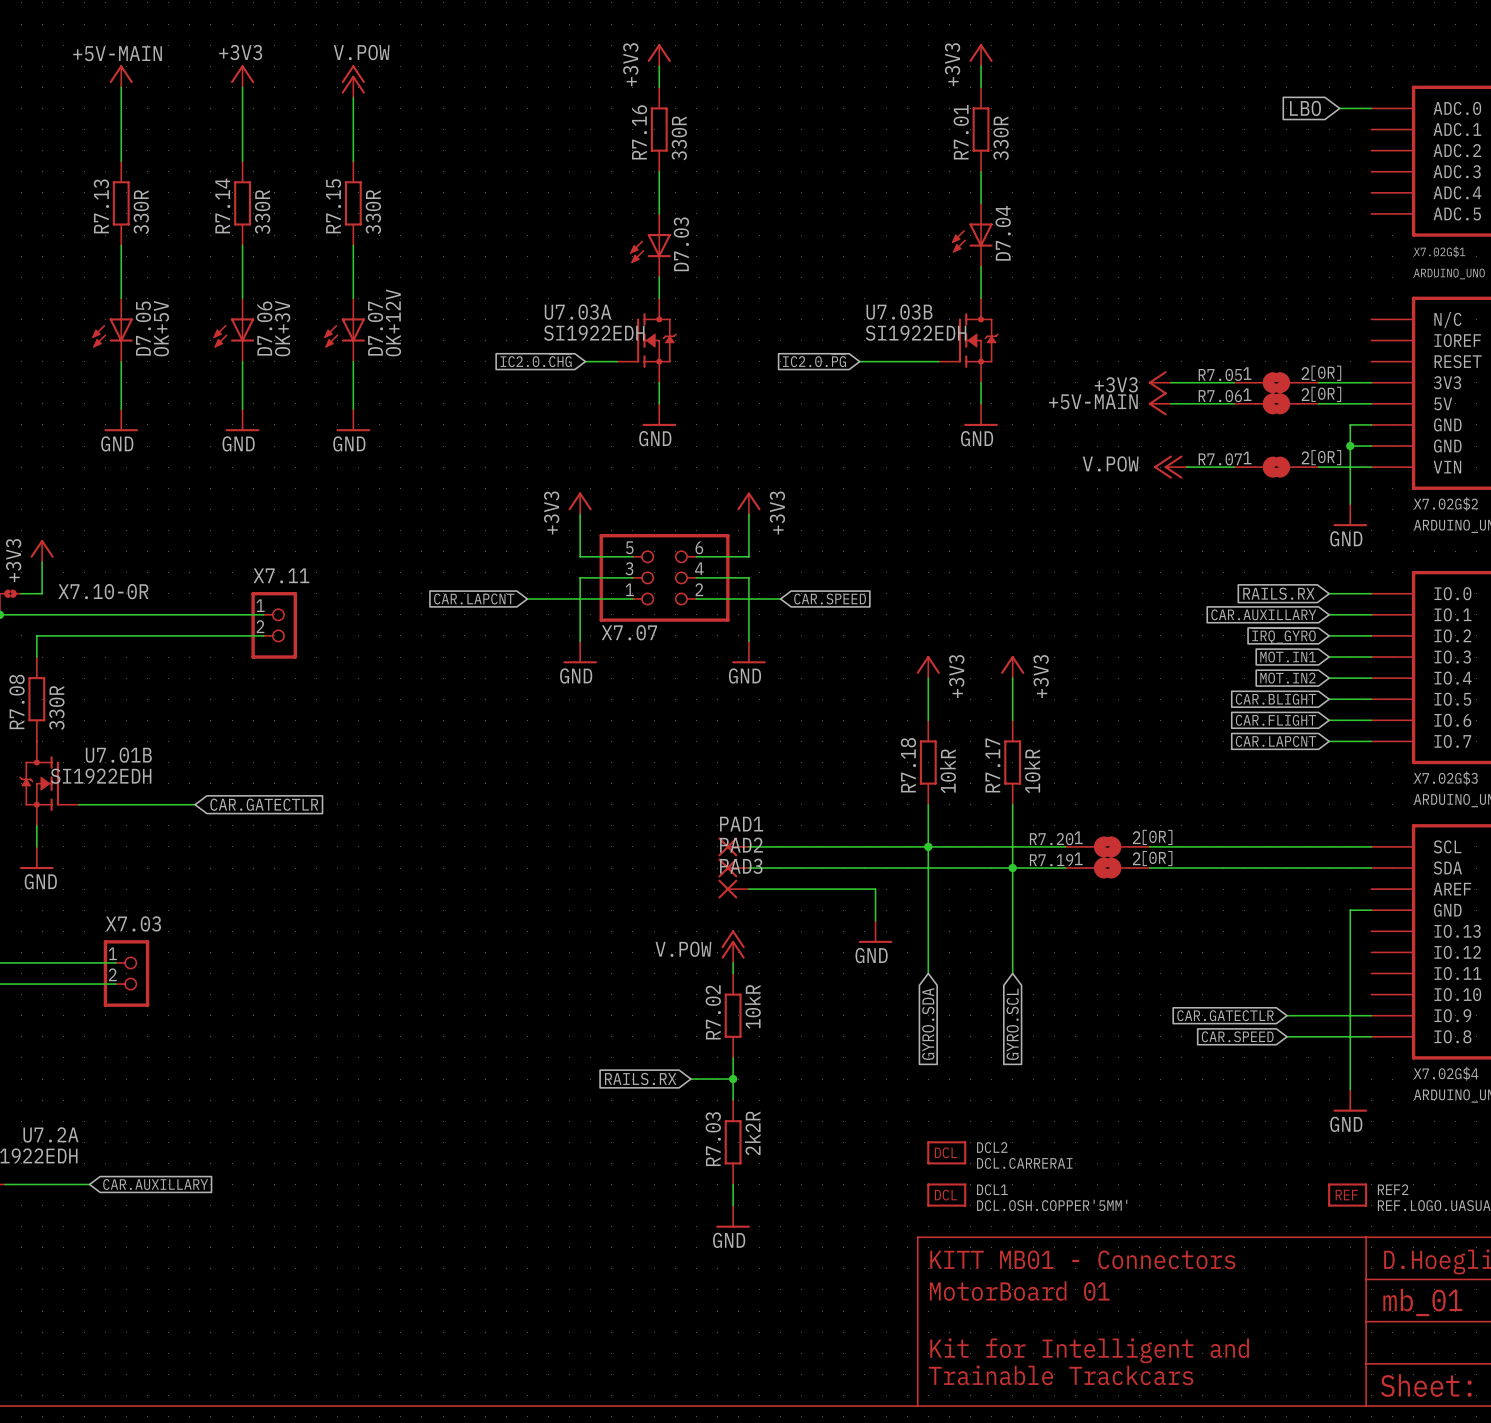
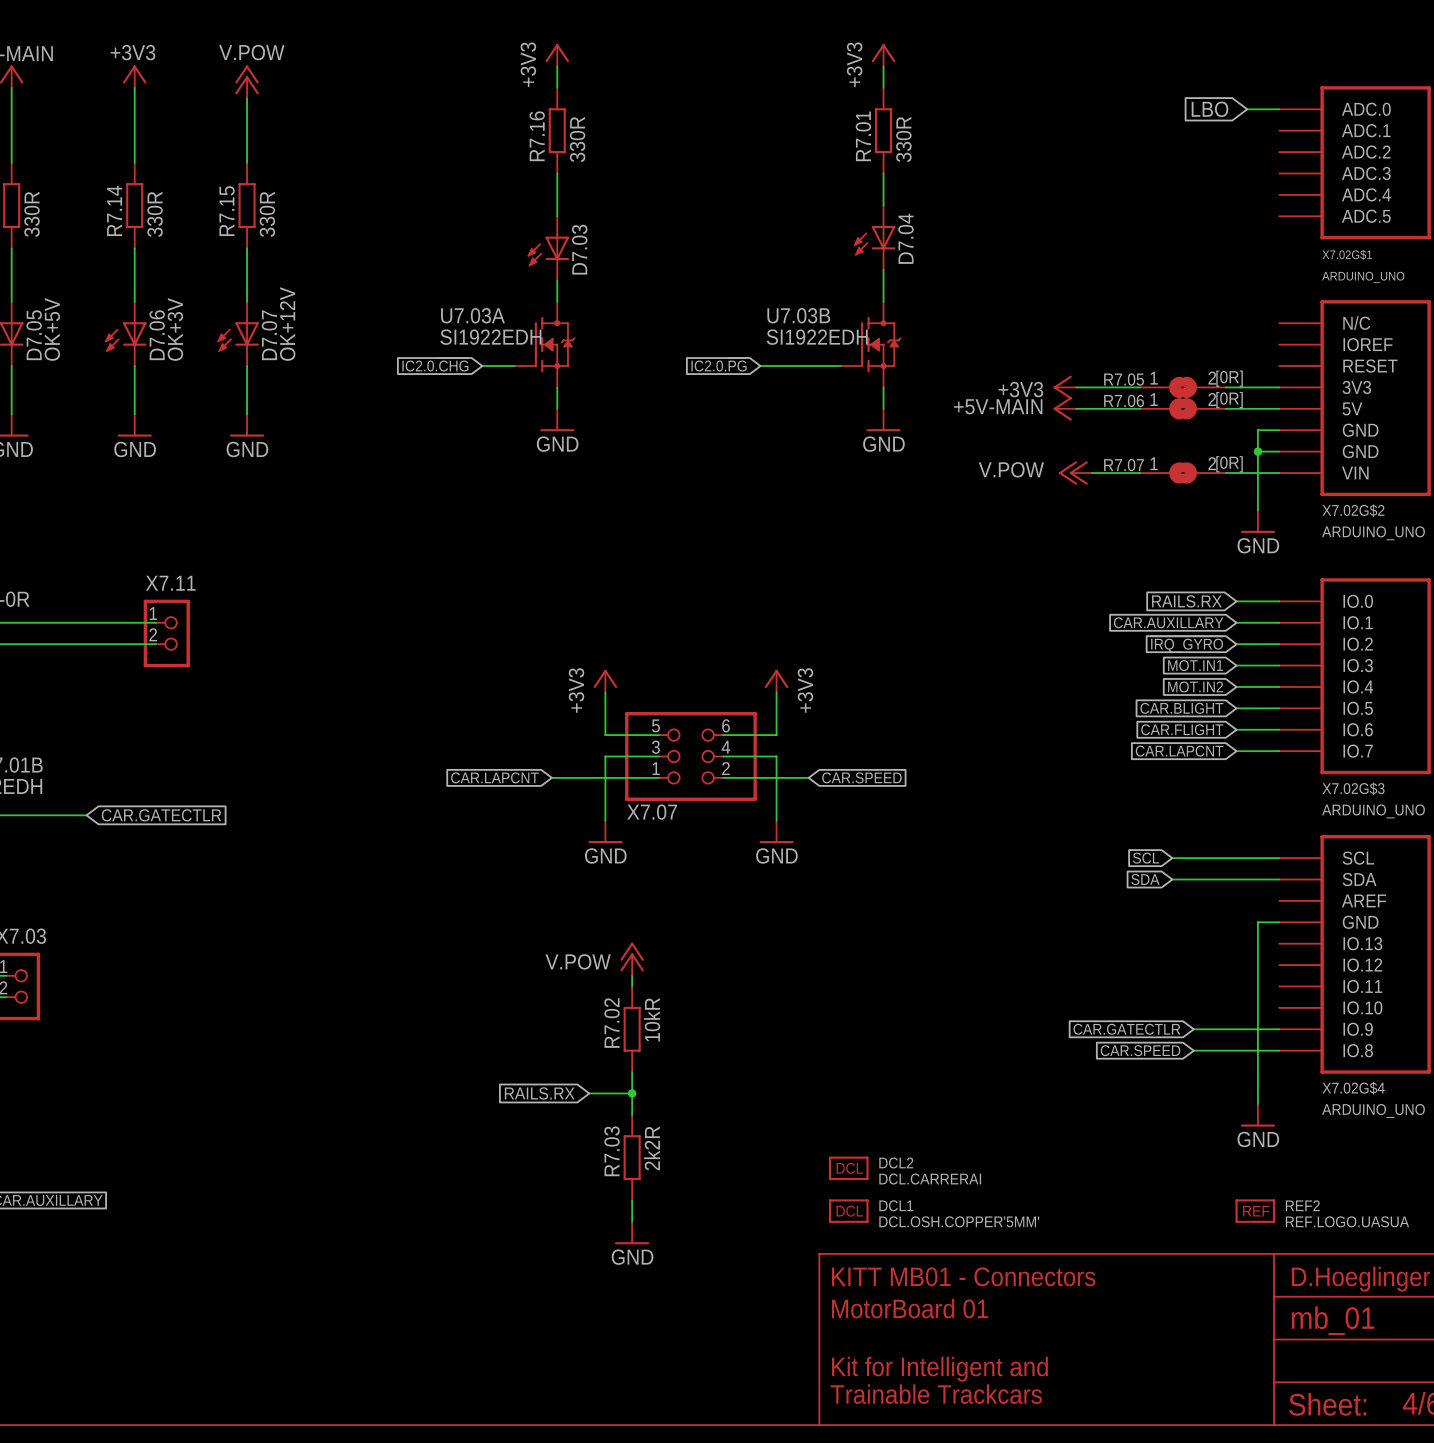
power symbol: +3V3 (580, 503) -> none
power symbol: +3V3 (748, 503) -> none
wire: (580, 514) (580, 556) (632, 556) -> none
wire: (748, 514) (748, 556) (696, 556) -> none
wire: (632, 577) (580, 577) (580, 641) -> none
X7.07 position: (664, 577) -> (690, 756)
wire: (696, 577) (748, 577) (748, 641) -> none
global label: CAR.LAPCNT (474, 598) -> none
wire: (527, 598) (632, 598) -> none
wire: (696, 598) (780, 598) -> none
global label: CAR.SPEED (830, 598) -> none
power symbol: GND (580, 652) -> none
power symbol: GND (748, 652) -> none
power symbol position: +3V3 (928, 667) -> +3V3 (776, 681)
power symbol: +3V3 (1012, 667) -> none
power symbol: none -> +3V3 (605, 681)
wire: (928, 678) (928, 720) -> none
wire: (1012, 678) (1012, 720) -> none
wire: none -> (605, 692) (605, 735) (658, 735)
wire: none -> (776, 692) (776, 735) (723, 735)
wire: none -> (658, 756) (605, 756) (605, 820)
wire: none -> (723, 756) (776, 756) (776, 820)
R7.18: 10kR (928, 762) -> none
R7.17: 10kR (1012, 762) -> none
global label: none -> CAR.LAPCNT (494, 777)
wire: none -> (551, 777) (658, 777)
wire: none -> (723, 777) (808, 777)
global label: none -> CAR.SPEED (861, 777)
wire: (928, 804) (928, 973) -> none
wire: (1012, 804) (1012, 973) -> none
power symbol: none -> GND (605, 831)
power symbol: none -> GND (776, 831)
PAD1: (733, 846) -> none
wire: (748, 846) (1065, 846) -> none
junction: (928, 846) -> none
R7.20: [0R] (1107, 846) -> none
wire: (1149, 846) (1265, 846) -> none
global label: none -> SCL (1146, 858)
PAD2: (733, 868) -> none
wire: (748, 868) (1065, 868) -> none
junction: (1012, 868) -> none
R7.19: [0R] (1107, 868) -> none
wire: (1149, 868) (1265, 868) -> none
global label: none -> SDA (1145, 879)
PAD3: (733, 889) -> none
wire: (748, 889) (875, 889) (875, 920) -> none
power symbol: GND (875, 931) -> none
global label: GYRO.SDA (928, 1024) -> none
global label: GYRO.SCL (1012, 1024) -> none

